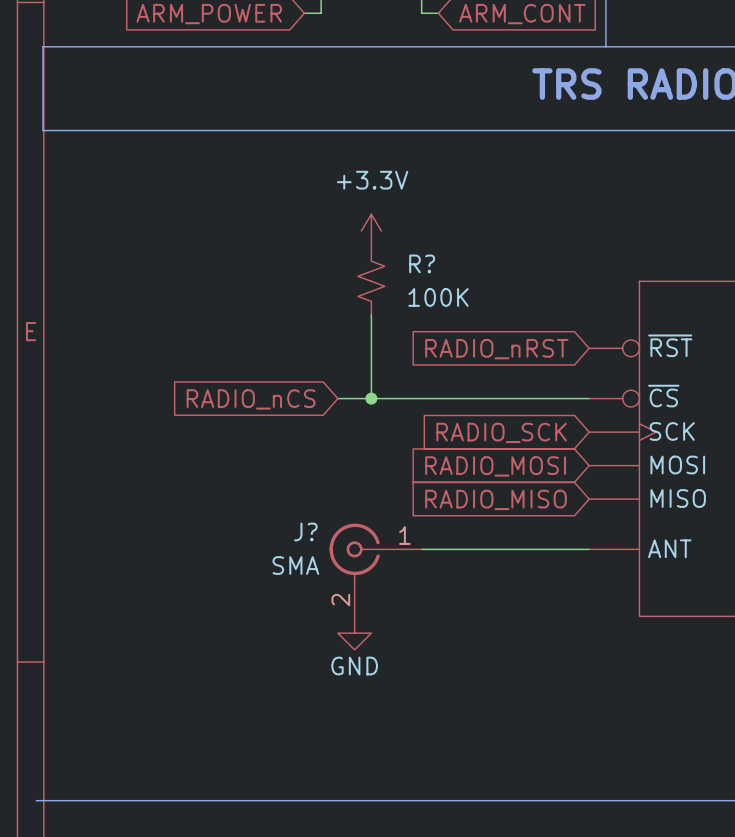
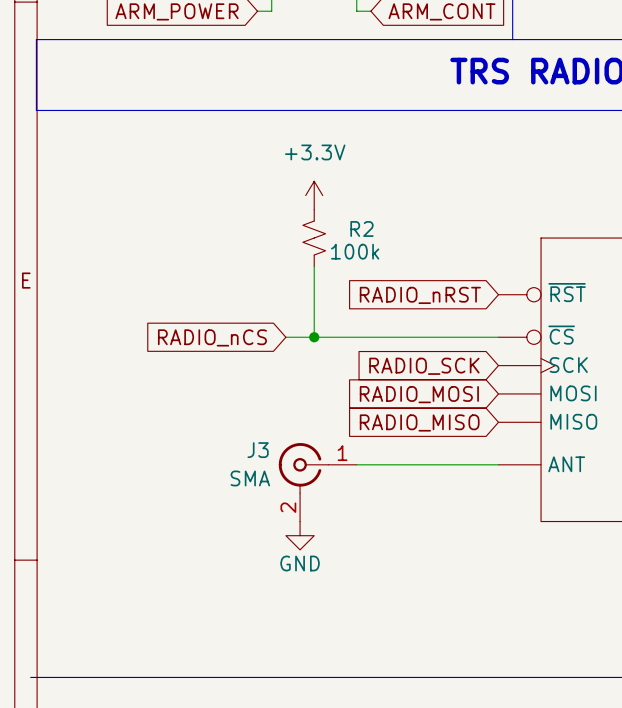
R?: 100K (371, 281) -> none
R2: none -> 100k (314, 238)
J? name: J? (305, 531) -> J3 (258, 450)

